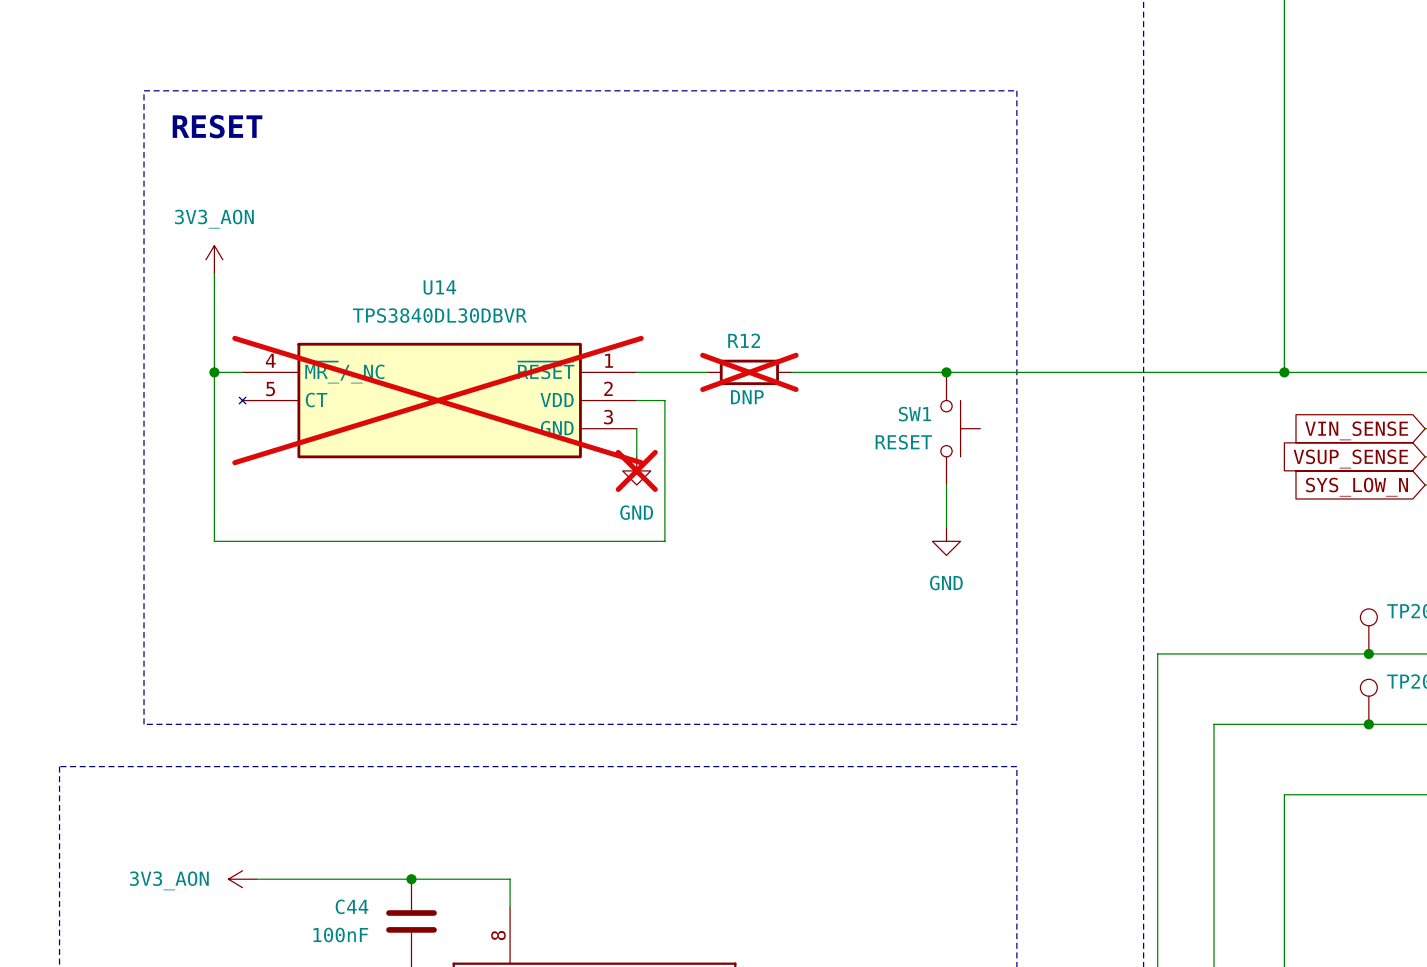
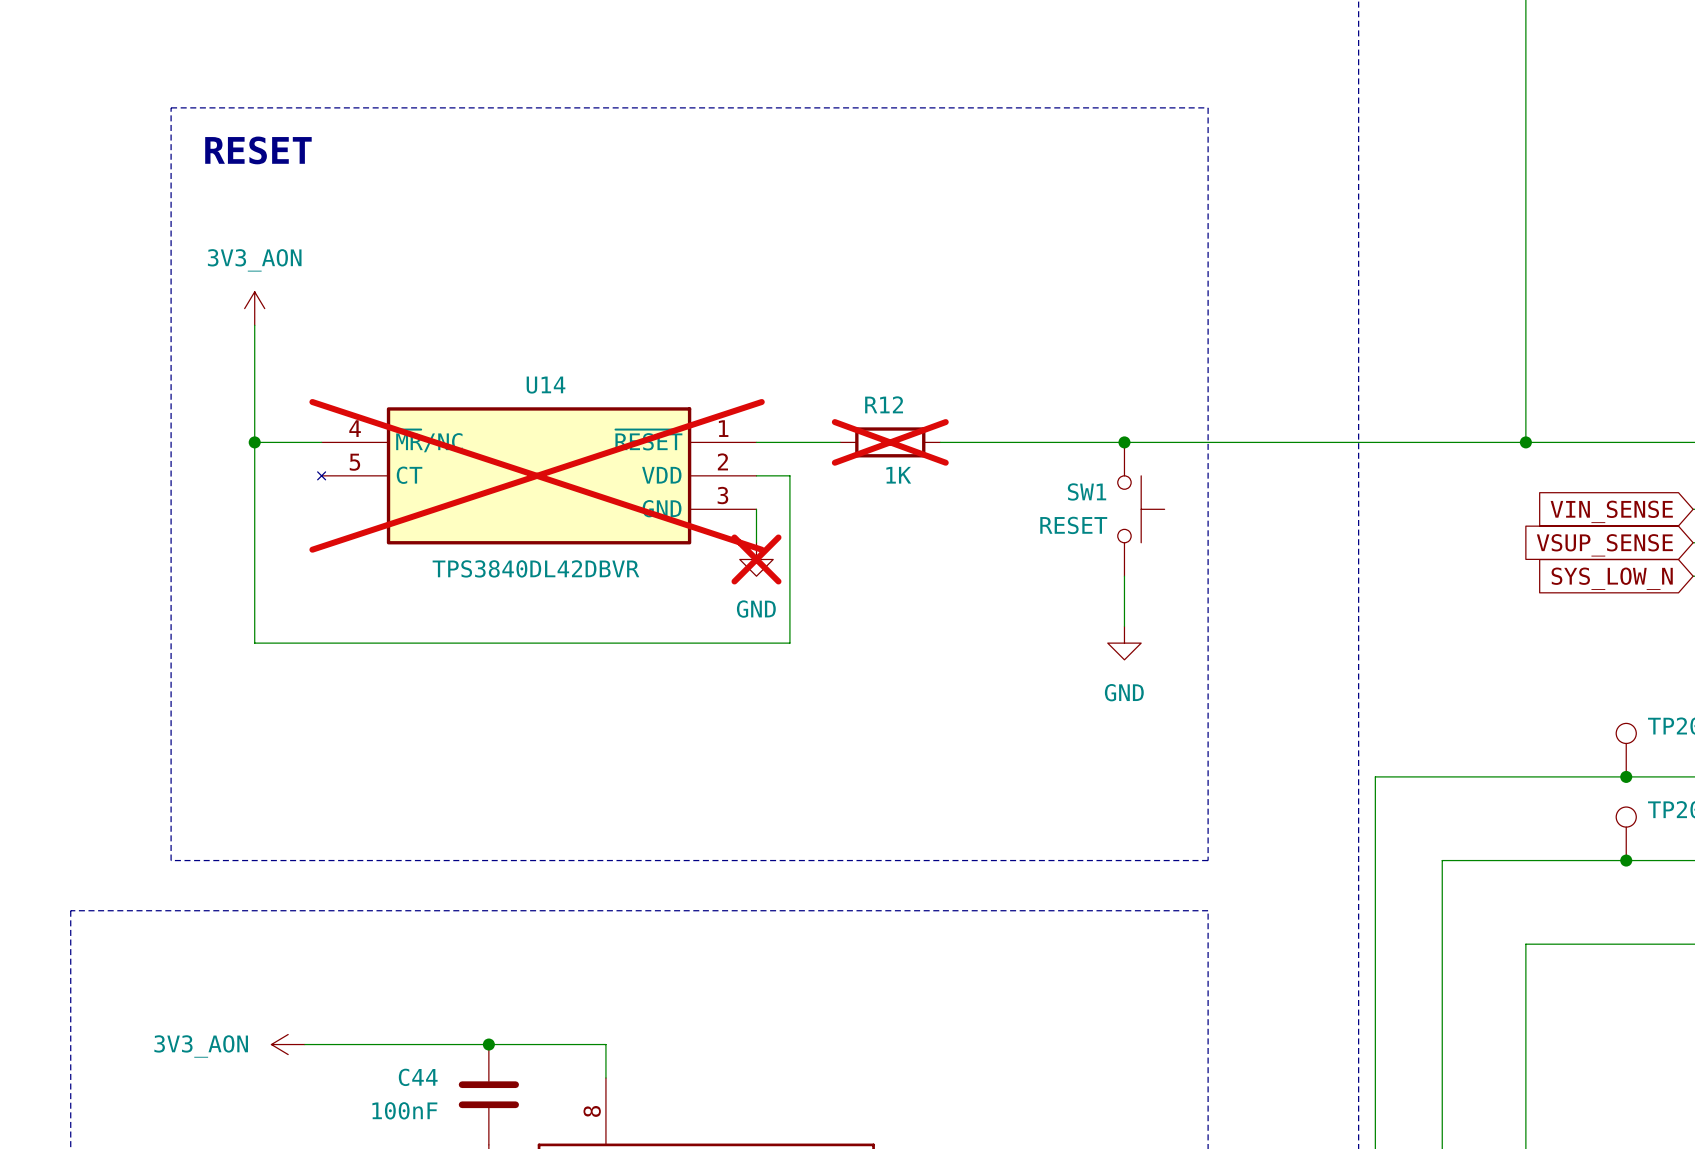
U14 name position: U14 (439, 287) -> U14 (546, 385)
U14 value: TPS3840DL30DBVR (439, 315) -> TPS3840DL42DBVR (535, 568)
U14 symbol: [239, 342, 637, 459] -> [317, 407, 757, 545]
R12 value: DNP (747, 397) -> 1K (898, 475)

